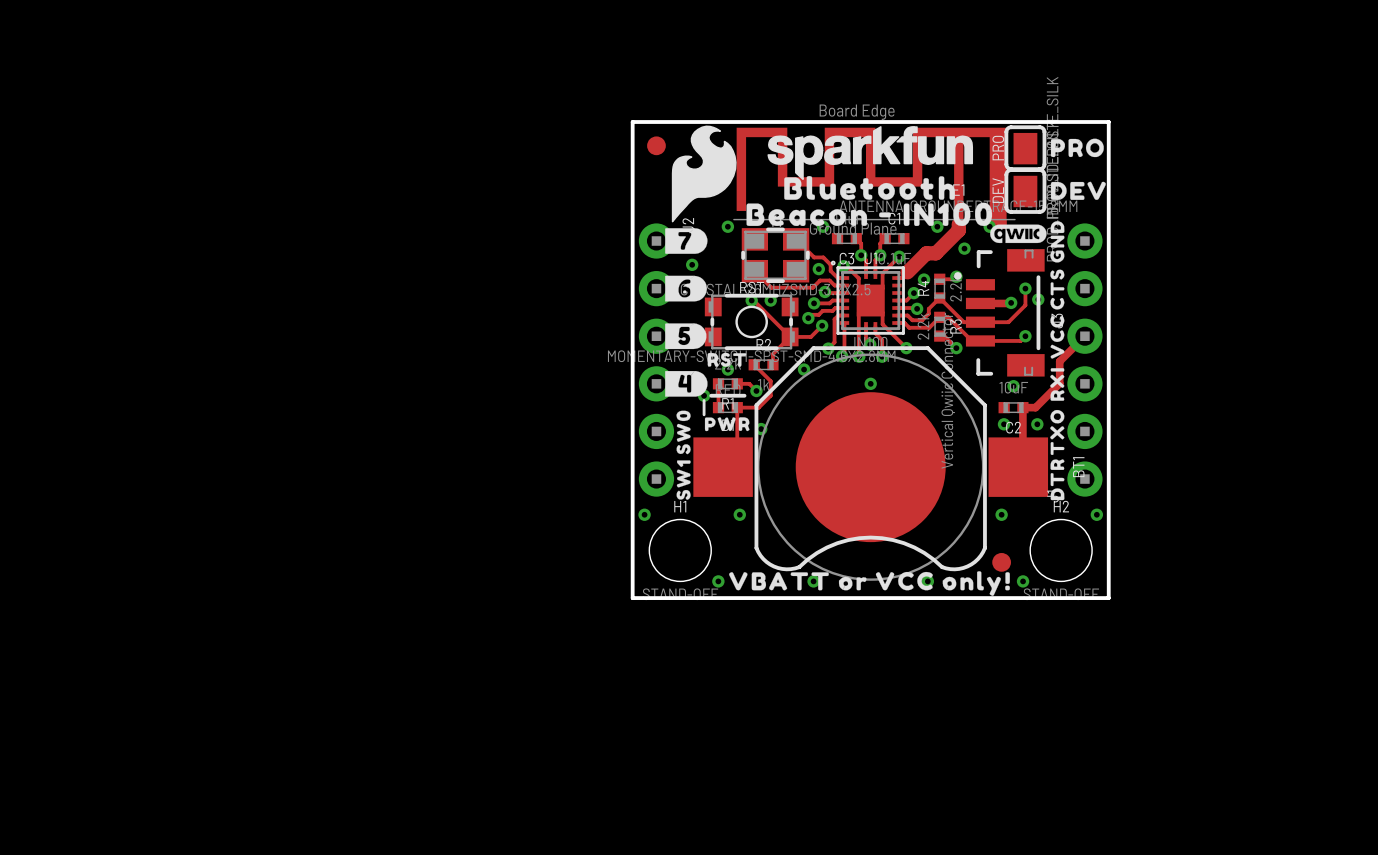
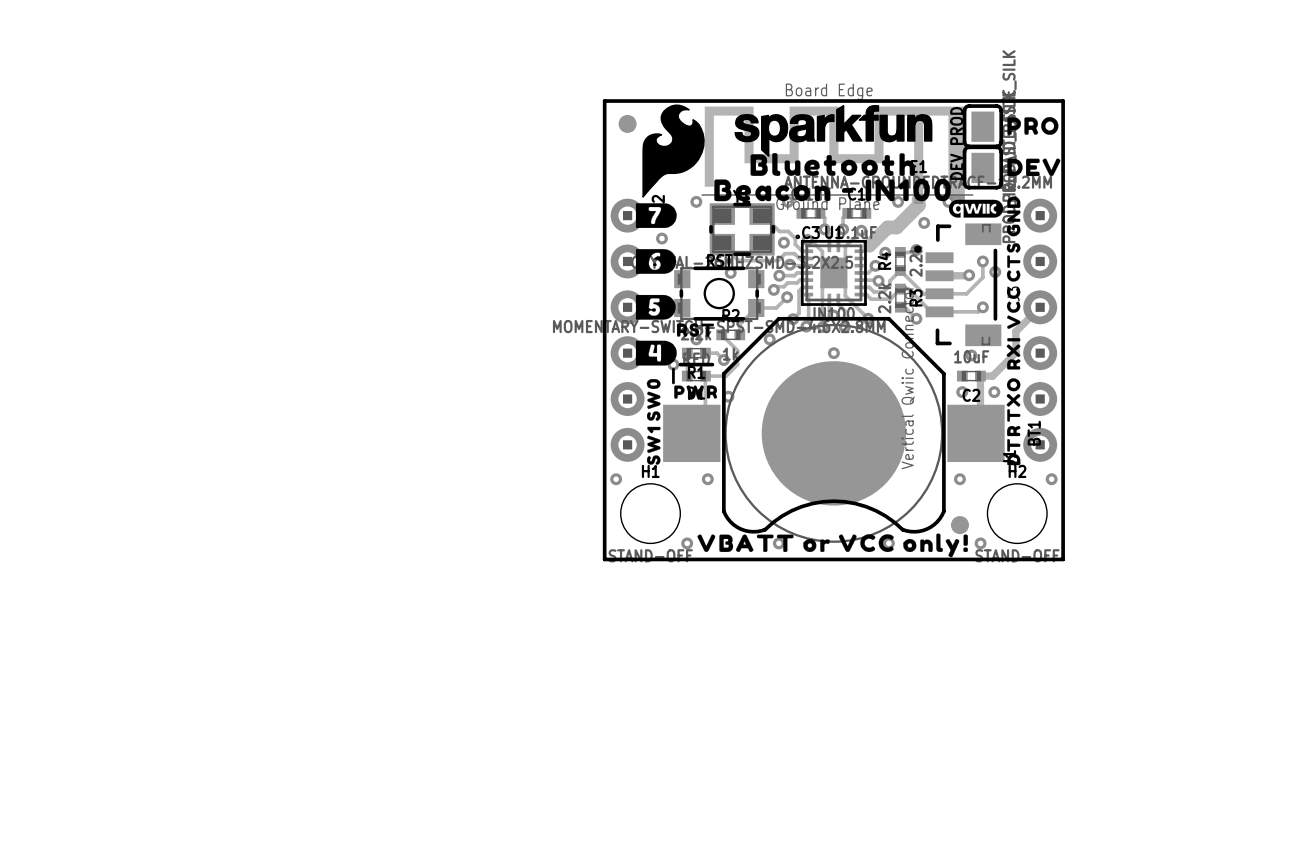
PRO name: PRO (998, 148) -> PROD (956, 125)
track: (751, 300) (790, 336) -> none
via: (751, 300) -> none
via: none -> (730, 272)
via: (770, 300) -> none

